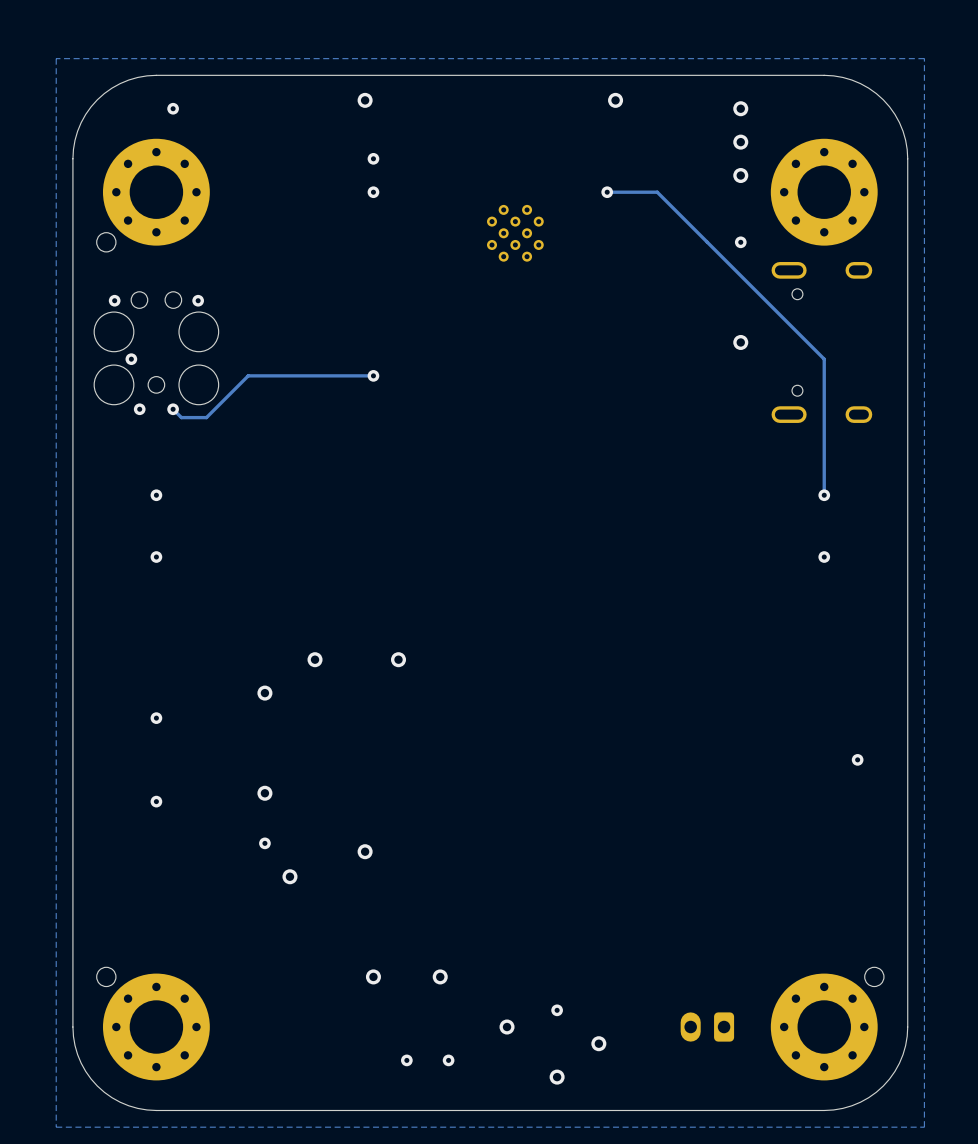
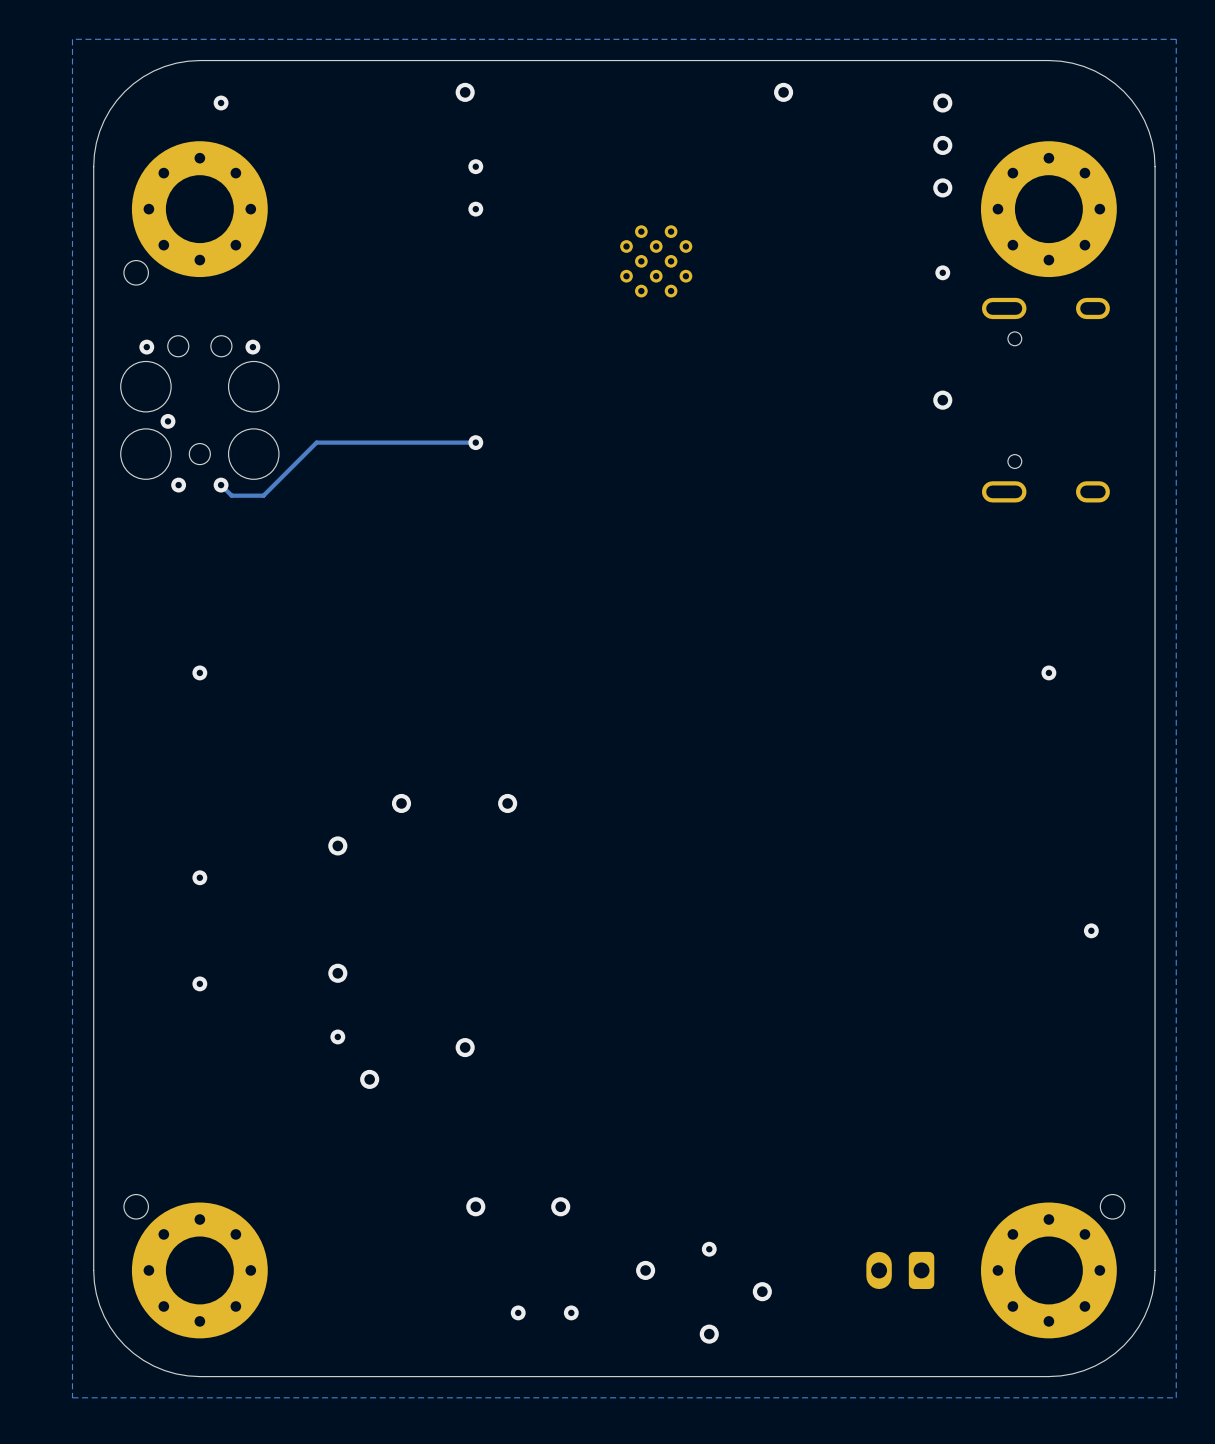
track: (607, 192) (657, 192) (824, 359) (824, 495) -> none
via: (607, 192) -> none
via: (156, 495) -> none
via: (824, 495) -> none

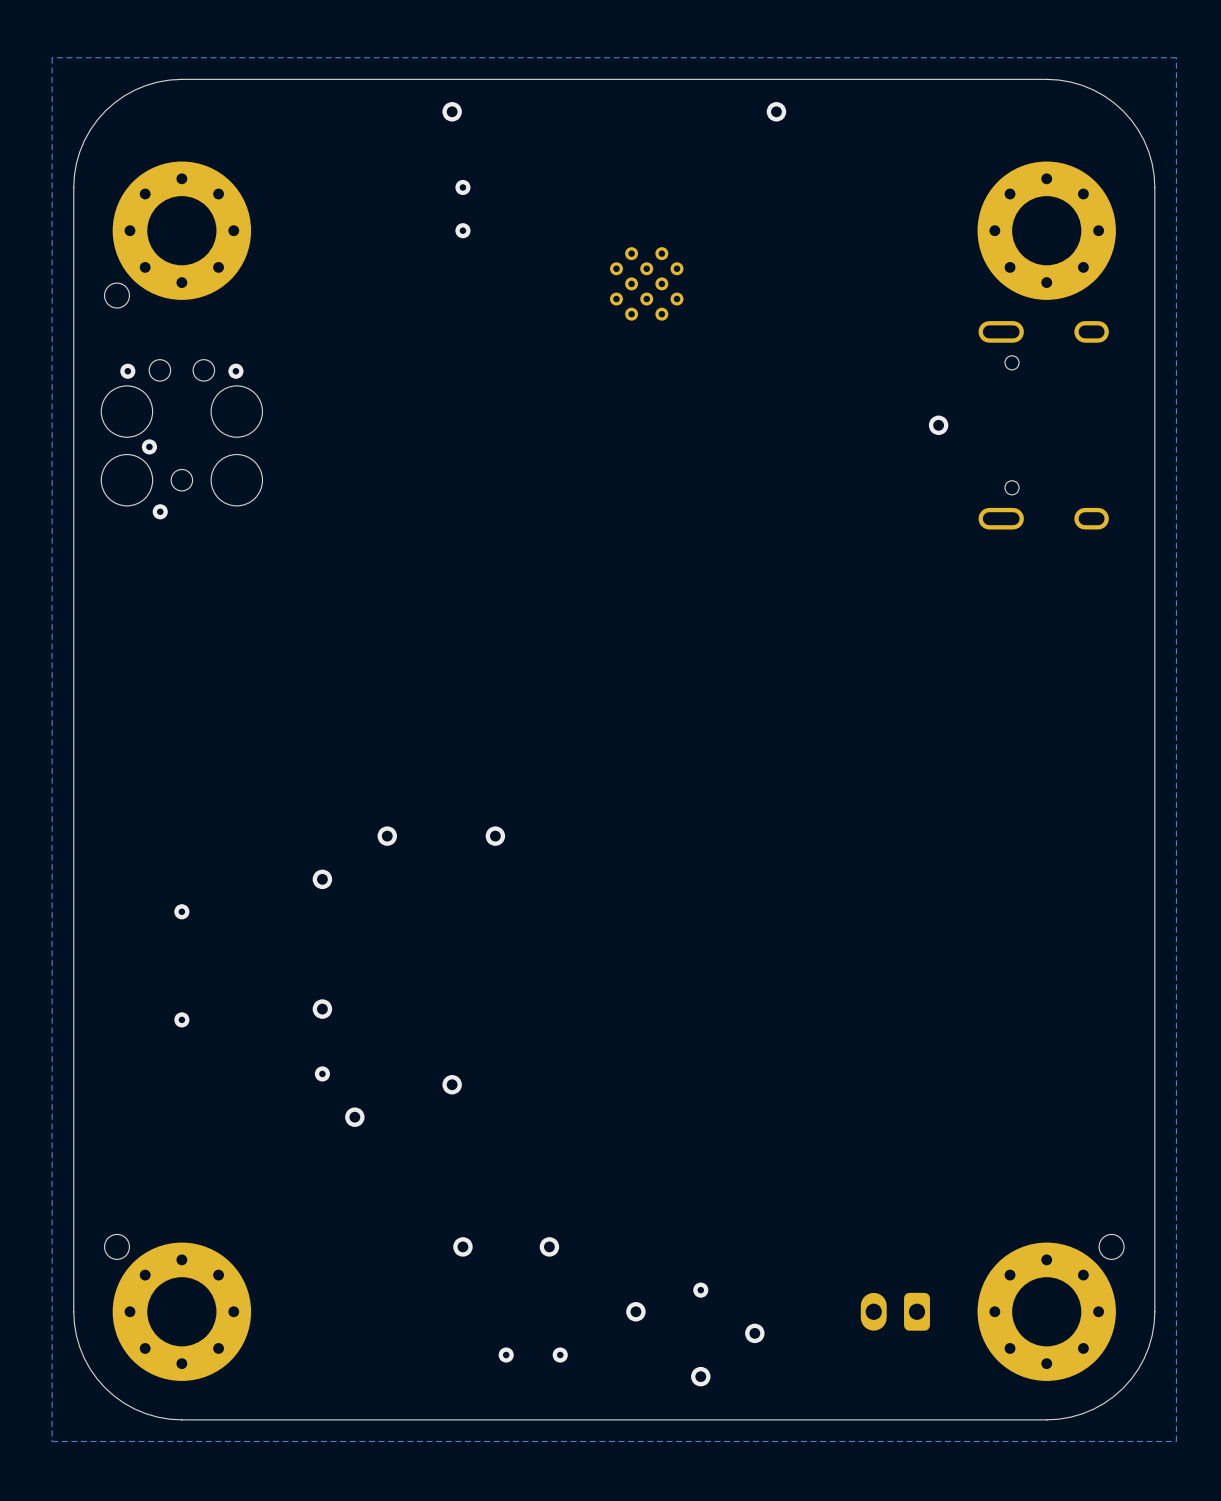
via: (221, 102) -> none
via: (942, 102) -> none
via: (942, 145) -> none
via: (942, 187) -> none
via: (942, 272) -> none
track: (475, 442) (316, 442) (263, 495) (231, 495) (221, 485) -> none
via: (475, 442) -> none
via: (221, 485) -> none
via: (199, 672) -> none
via: (1048, 672) -> none
via: (1091, 930) -> none

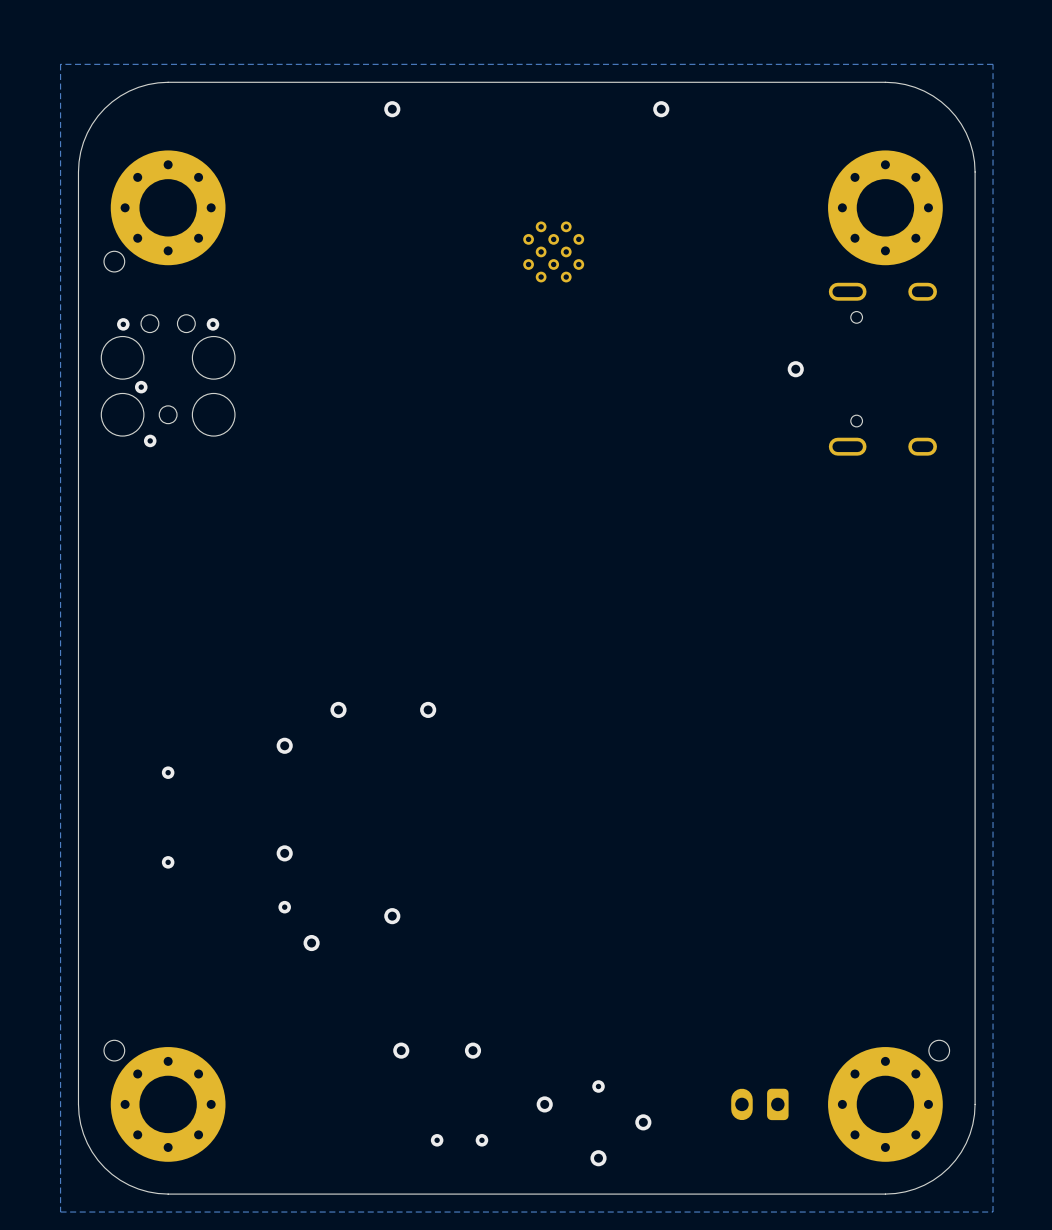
via: (462, 187) -> none
via: (462, 230) -> none

